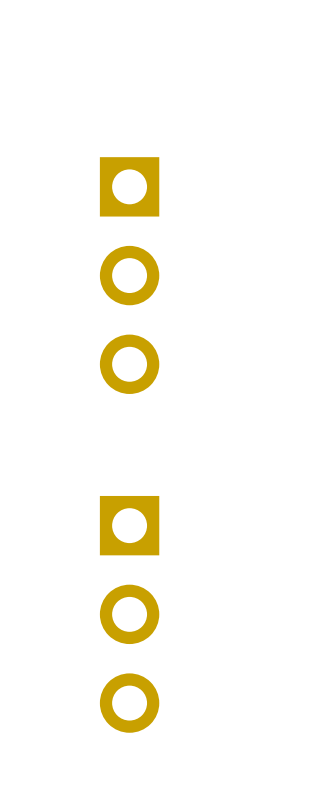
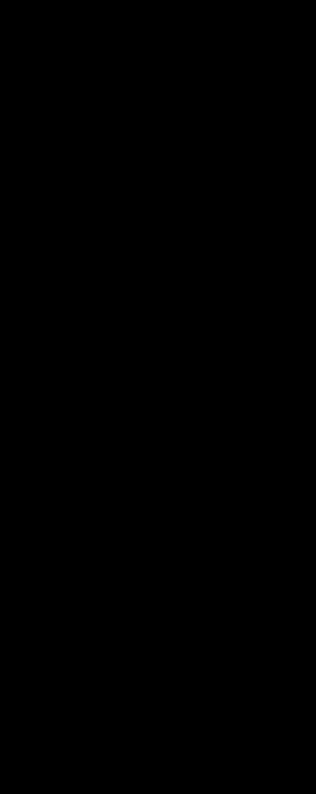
part: (129, 275) -> none
part: (129, 614) -> none

